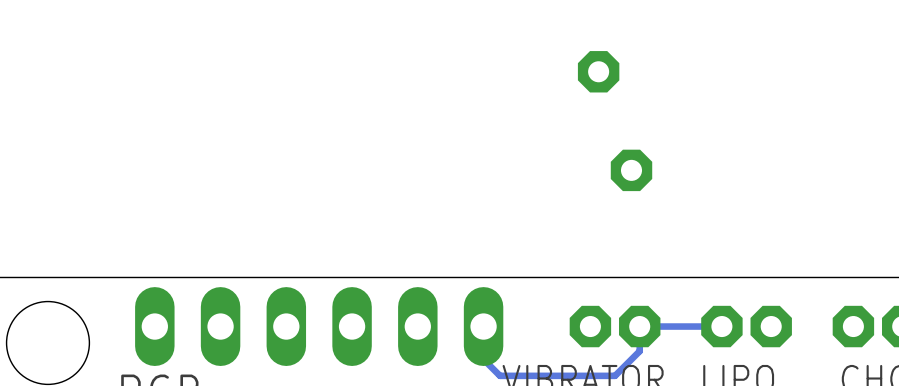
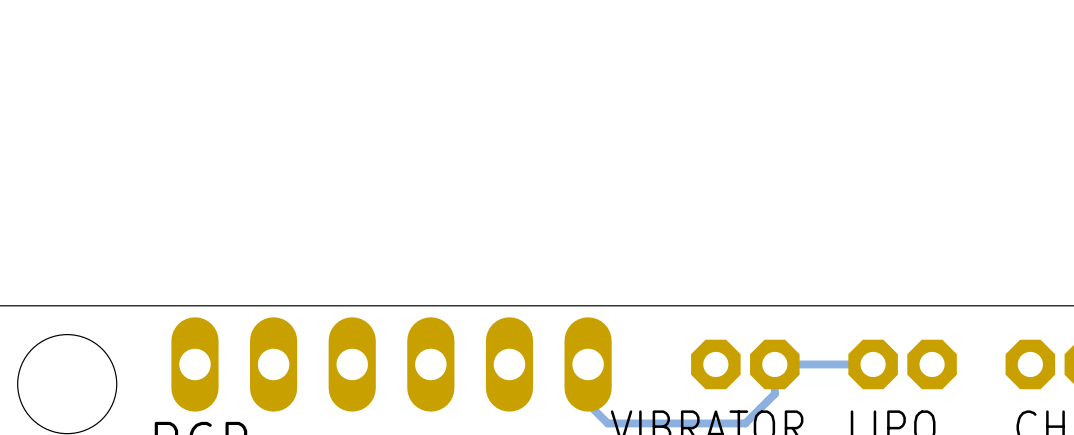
part: (598, 71) -> none
part: (631, 170) -> none

